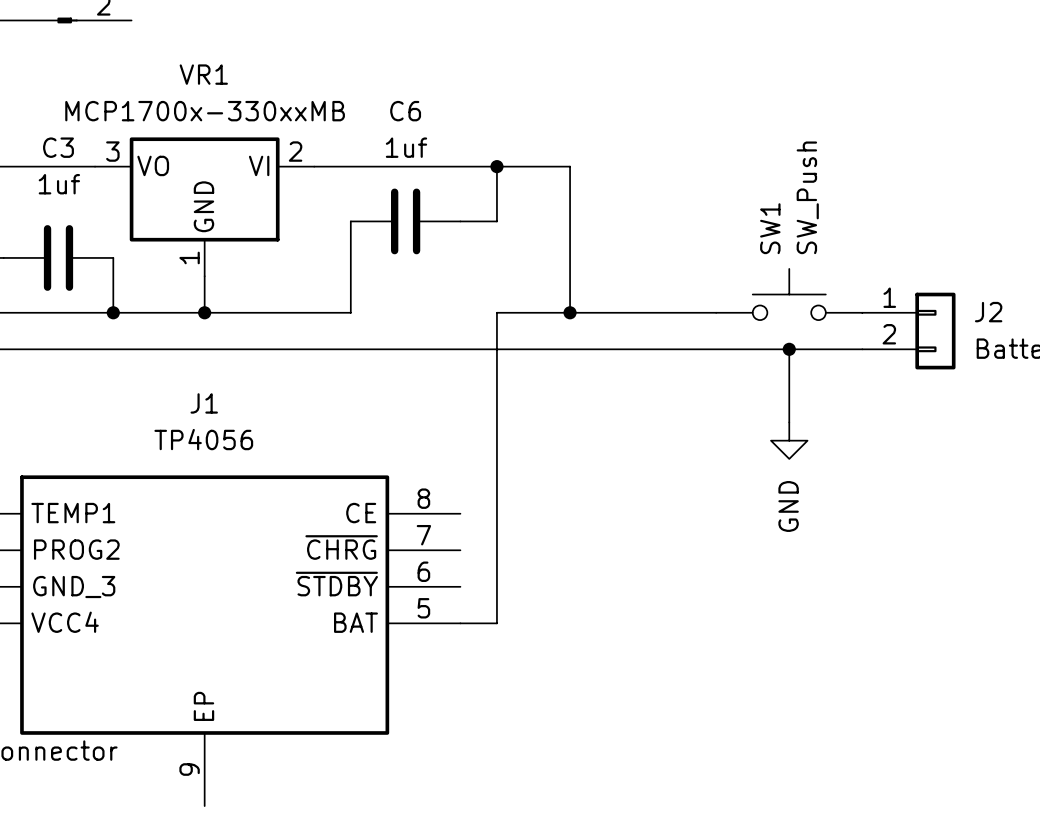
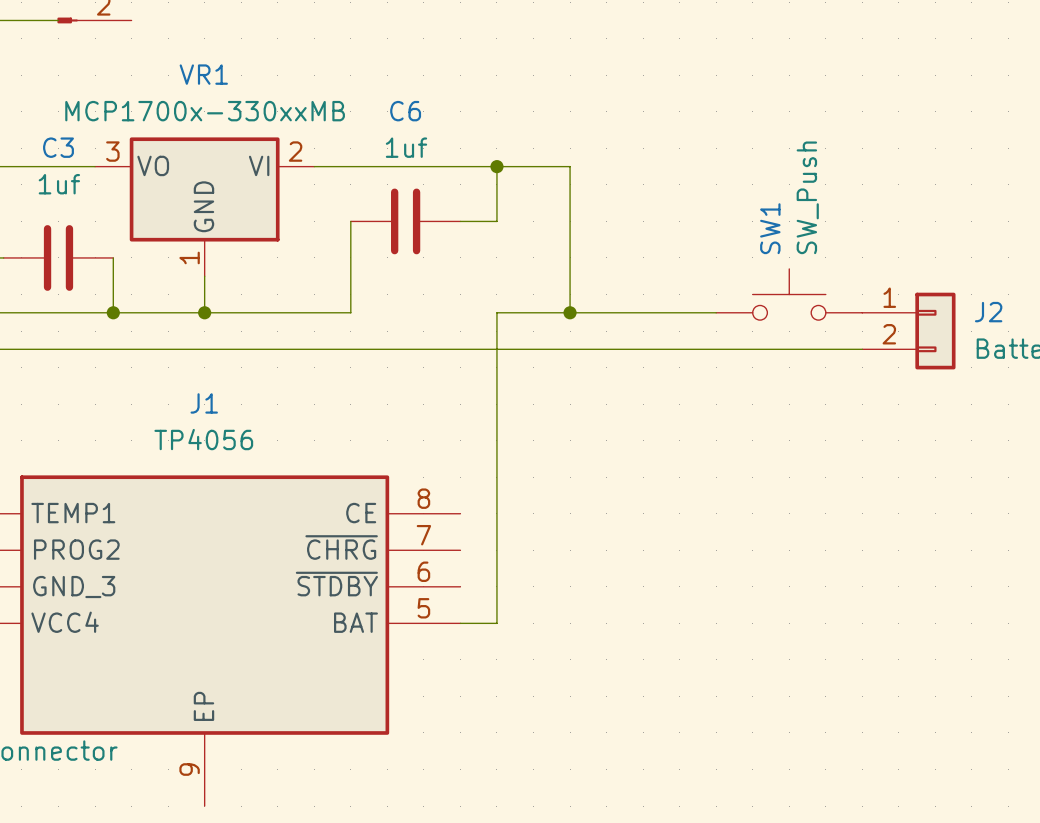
wire: (789, 349) (789, 422) -> none
junction: (789, 349) -> none
power symbol: GND (789, 440) -> none

